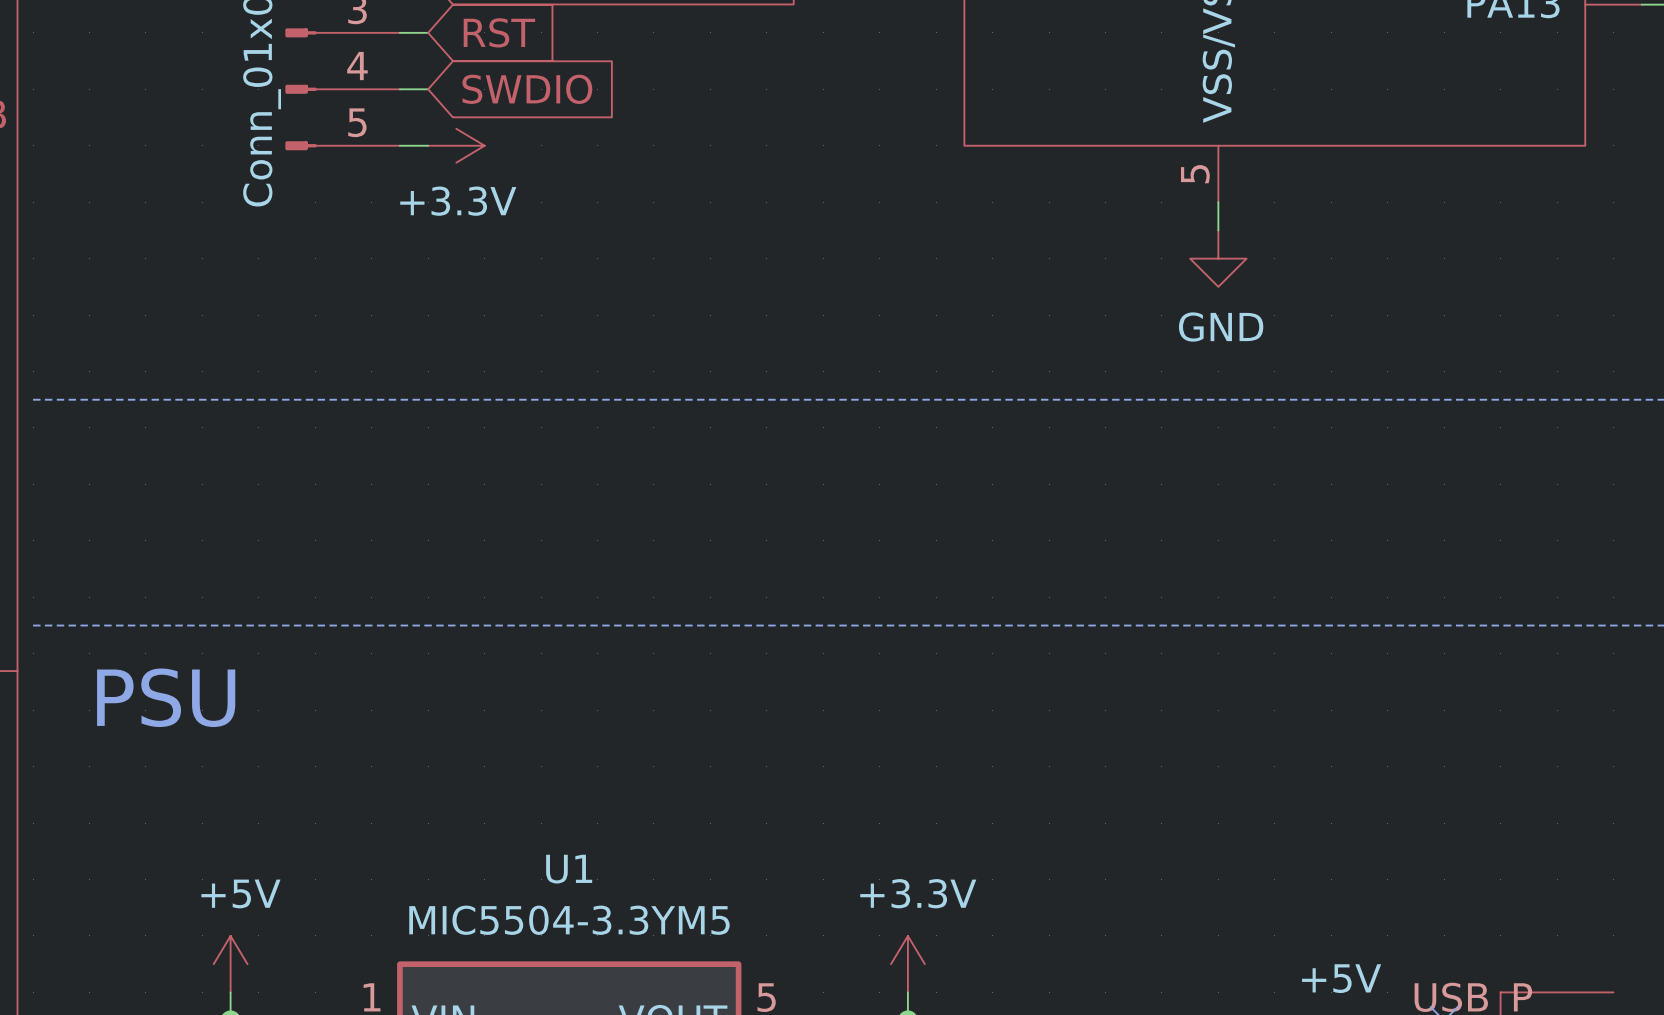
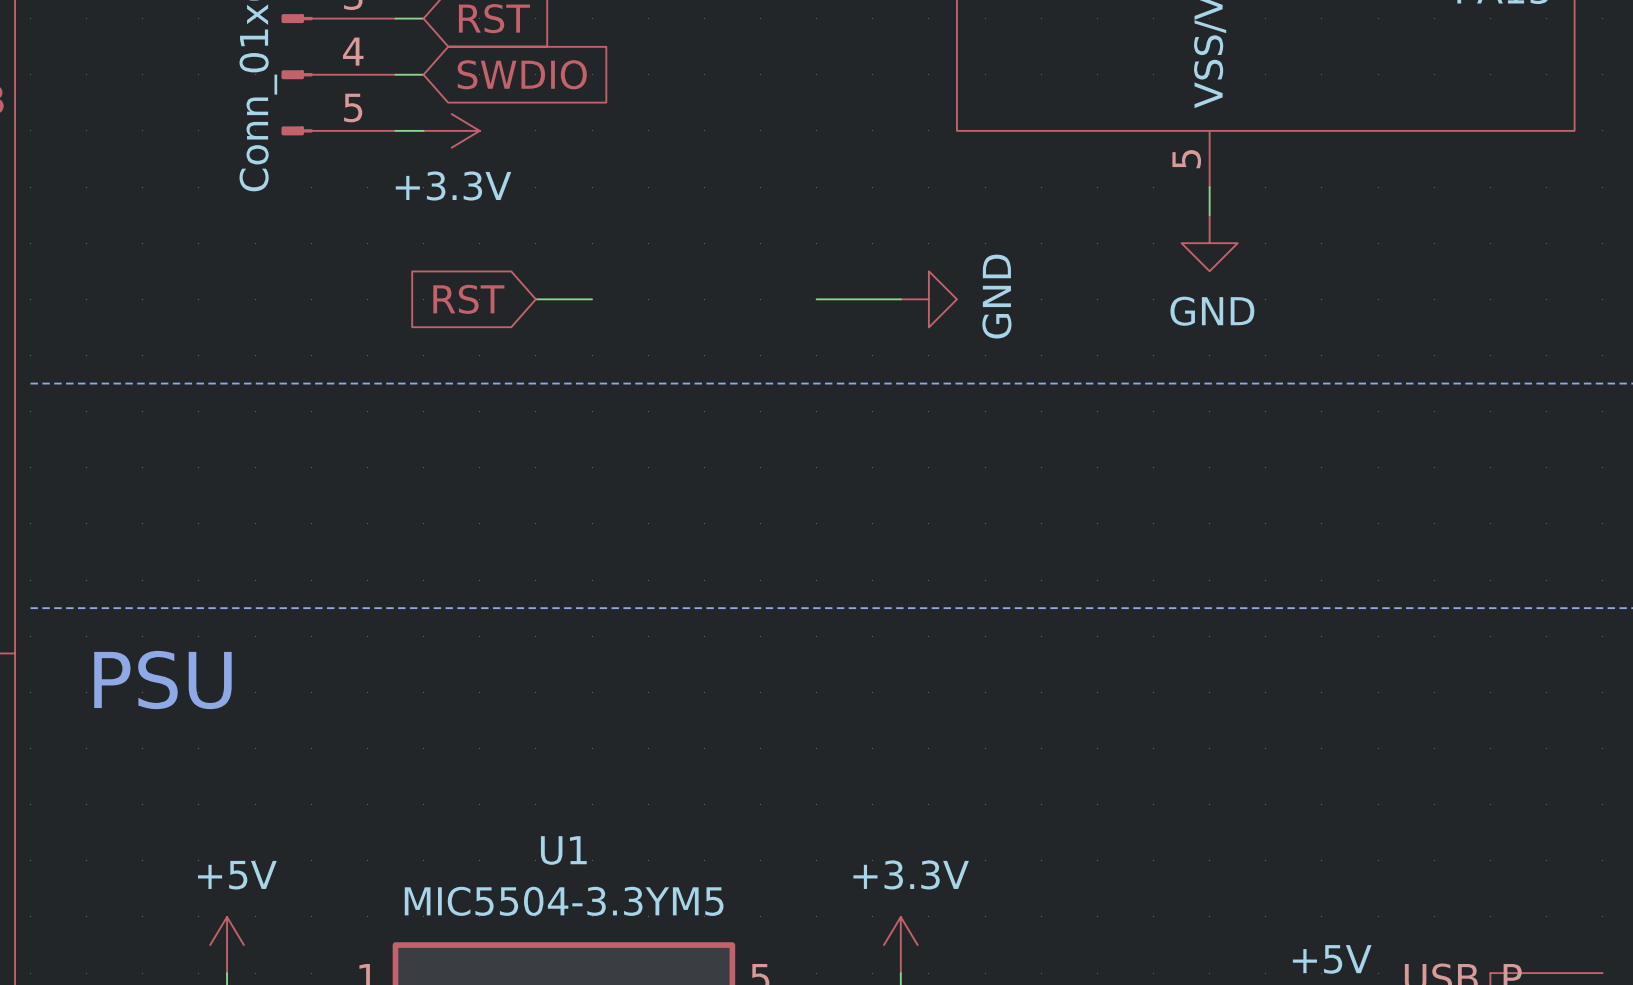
global label: none -> RST (468, 299)
wire: none -> (535, 299) (592, 299)
wire: none -> (816, 299) (900, 299)
power symbol: none -> GND (928, 299)

